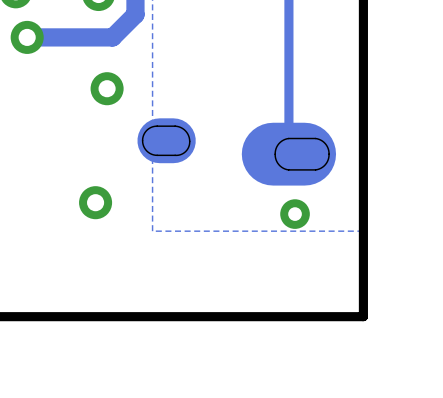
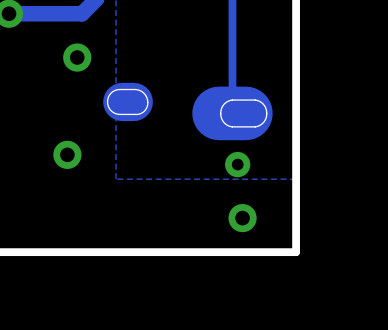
via: none -> (242, 218)

